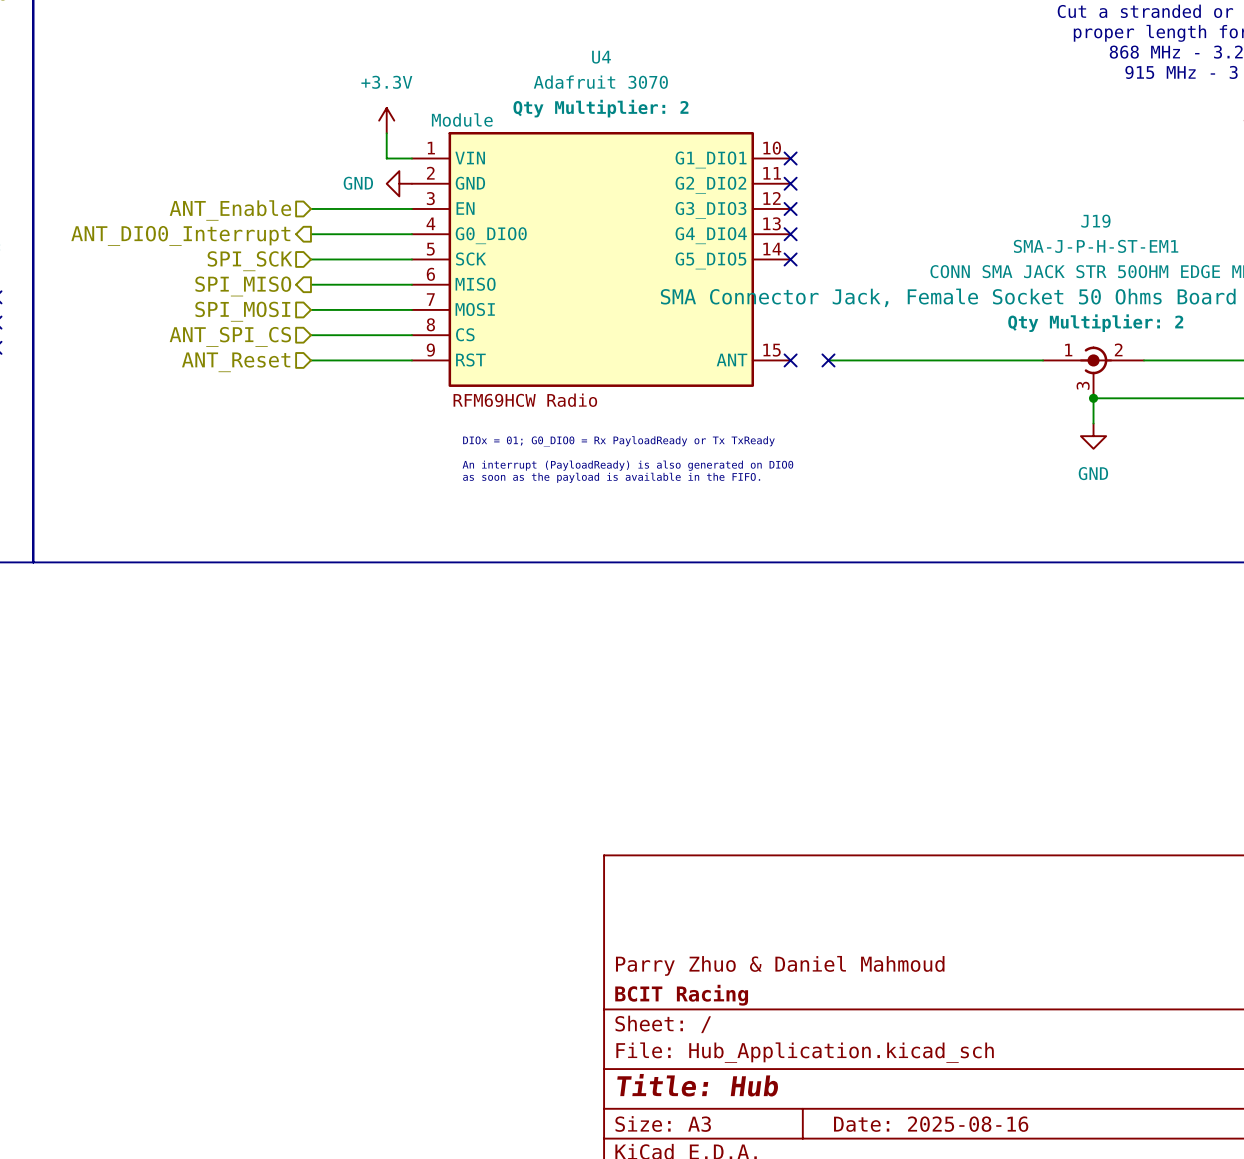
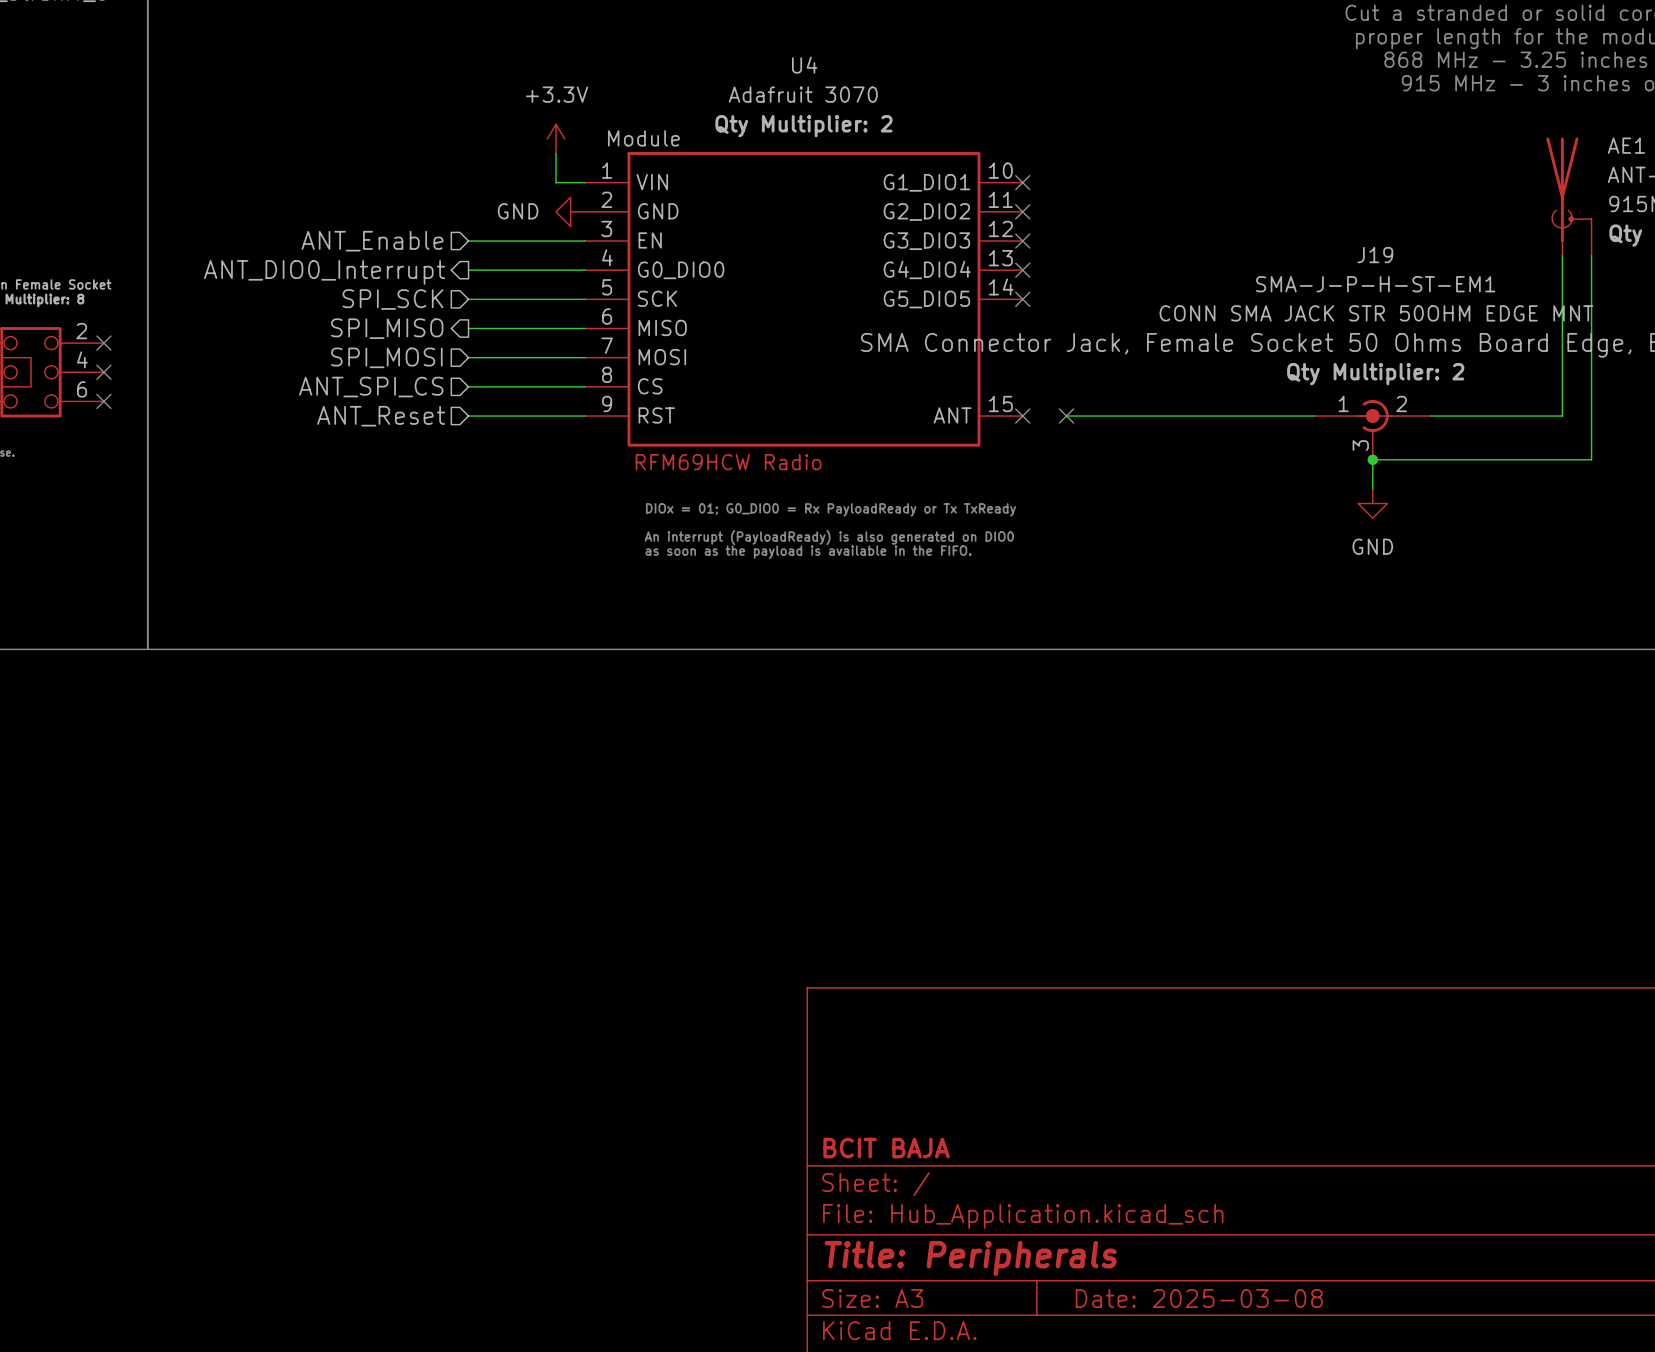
title block: Parry Zhuo & Daniel Mahmoud (780, 965) -> none
title block: BCIT Racing (681, 995) -> BCIT BAJA (886, 1148)
title block: Title: Hub (697, 1085) -> Title: Peripherals (970, 1258)
title block: Date: 2025-08-16 (931, 1124) -> Date: 2025-03-08 (1199, 1298)

